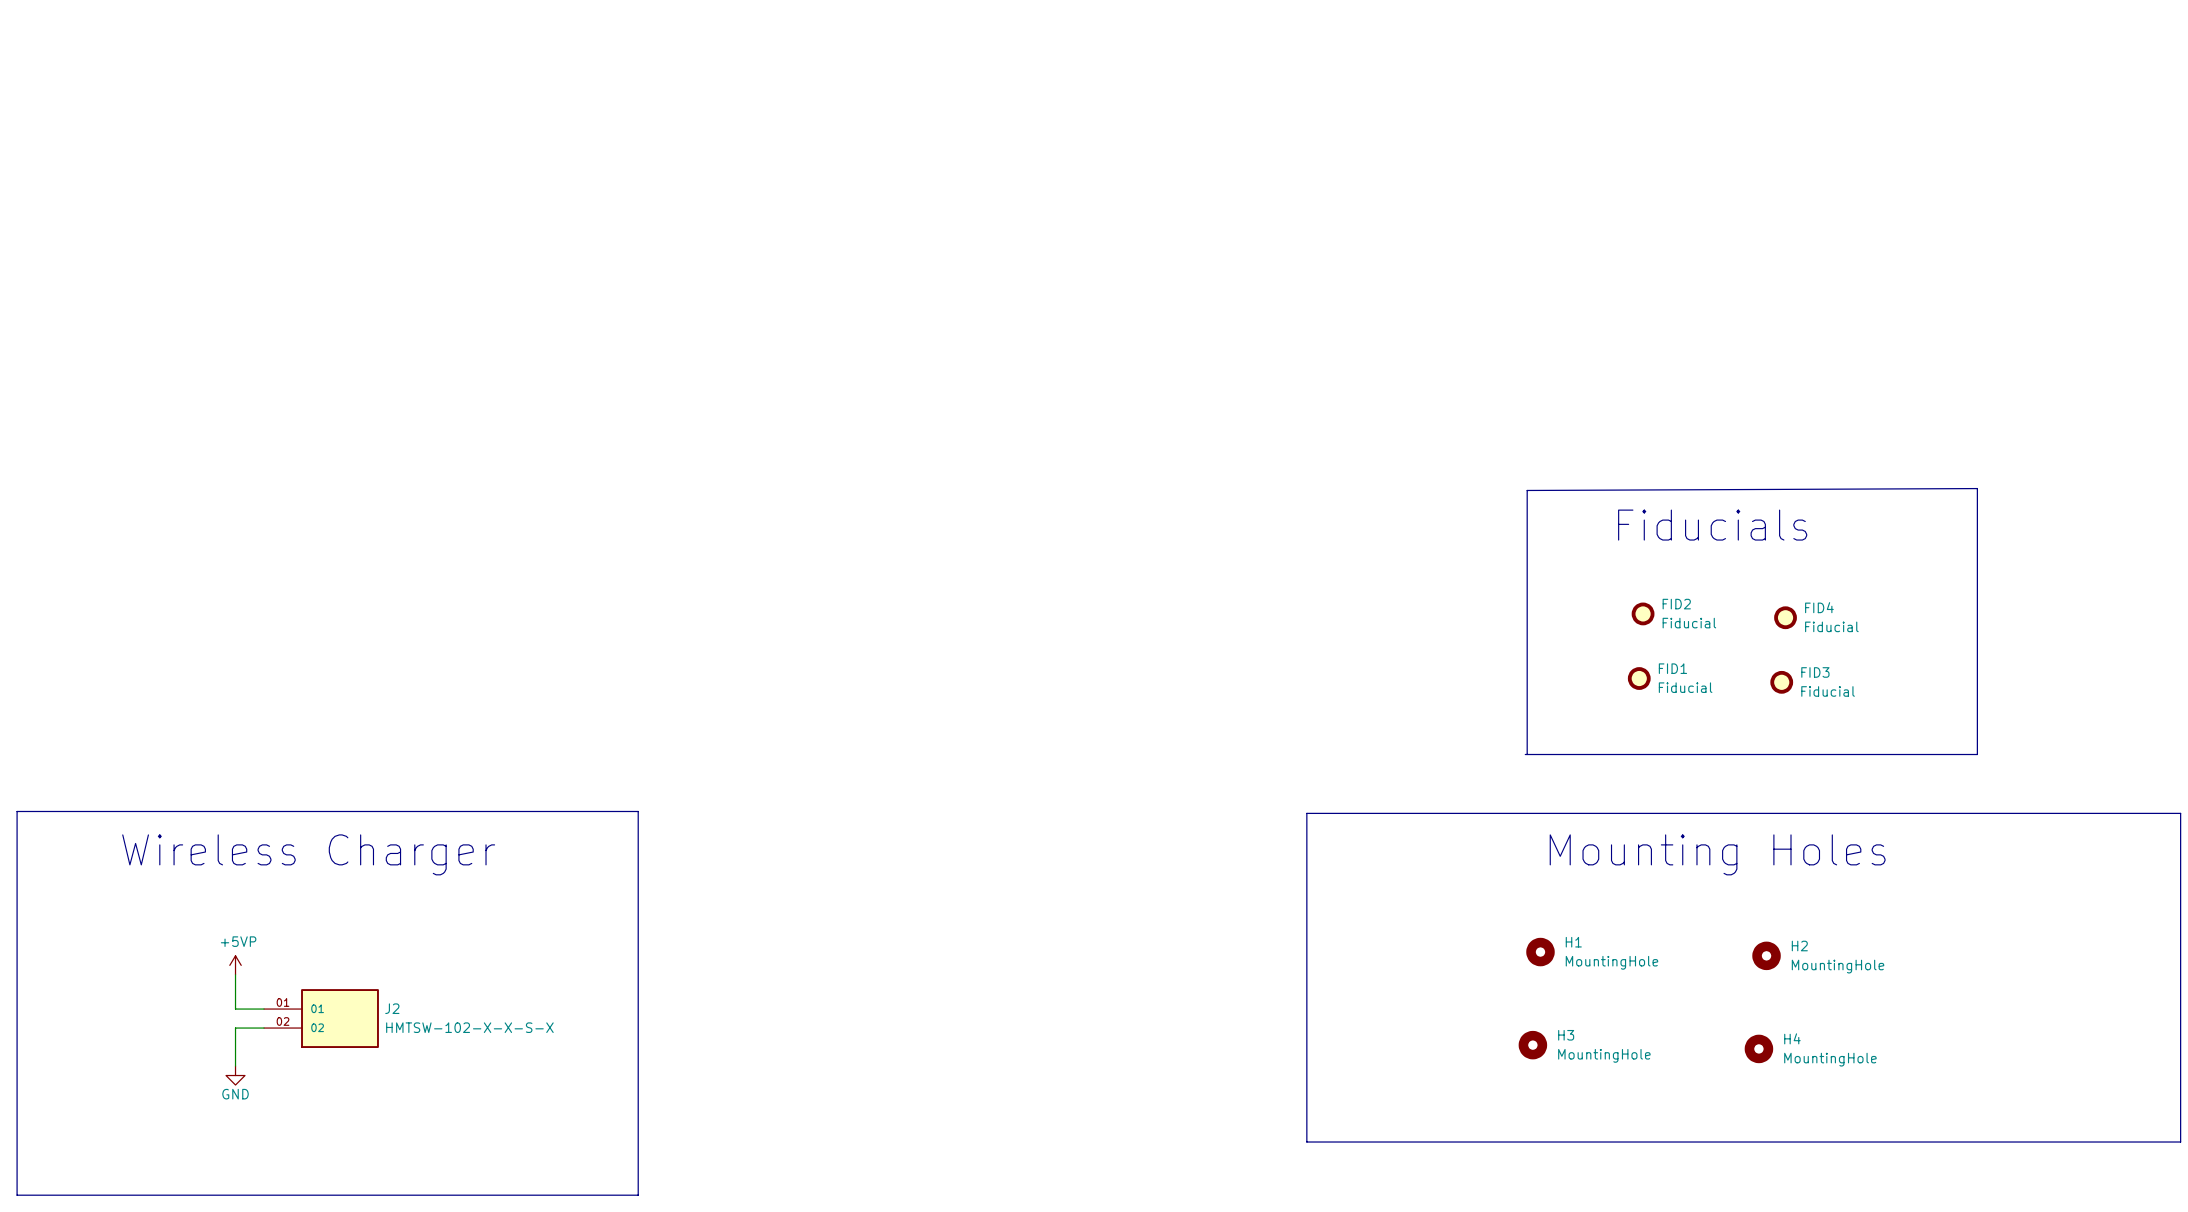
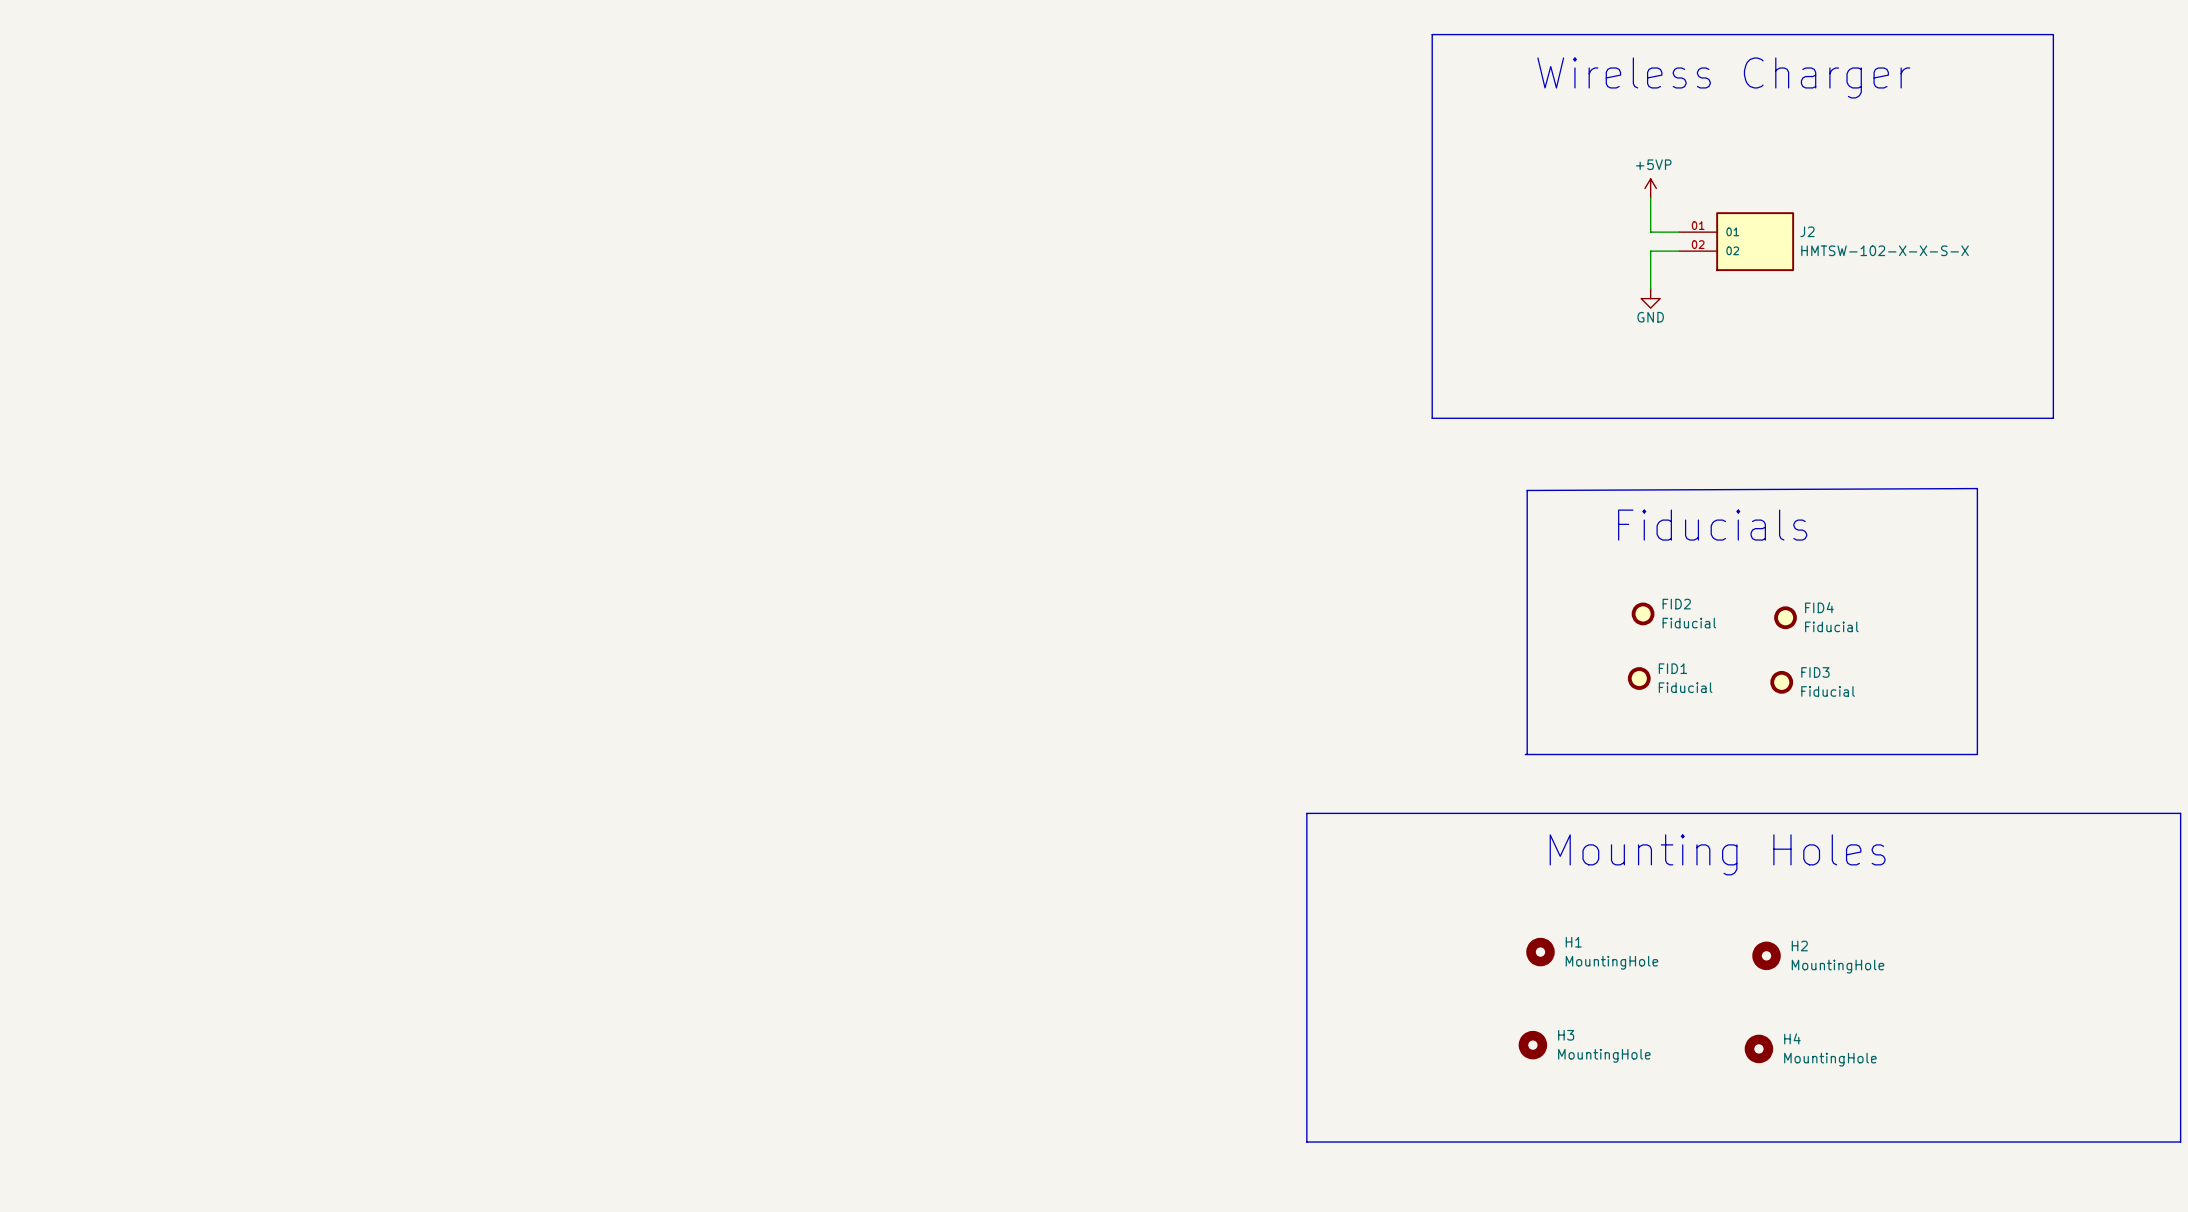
line: none -> (1432, 34) (2053, 34) (2053, 418) (1432, 418) (1432, 34)
text: none -> Wireless Charger (1723, 77)
power symbol: none -> +5VP (1650, 188)
wire: none -> (1650, 197) (1650, 232) (1679, 232)
wire: none -> (1679, 251) (1650, 251) (1650, 289)
power symbol: none -> GND (1650, 298)
line: (17, 811) (638, 811) (638, 1195) (17, 1195) (17, 811) -> none
text: Wireless Charger (308, 854) -> none
power symbol: +5VP (235, 965) -> none
wire: (235, 974) (235, 1009) (264, 1009) -> none
J2 position: (321, 1018) -> (1736, 241)
wire: (264, 1028) (235, 1028) (235, 1066) -> none
power symbol: GND (235, 1075) -> none

